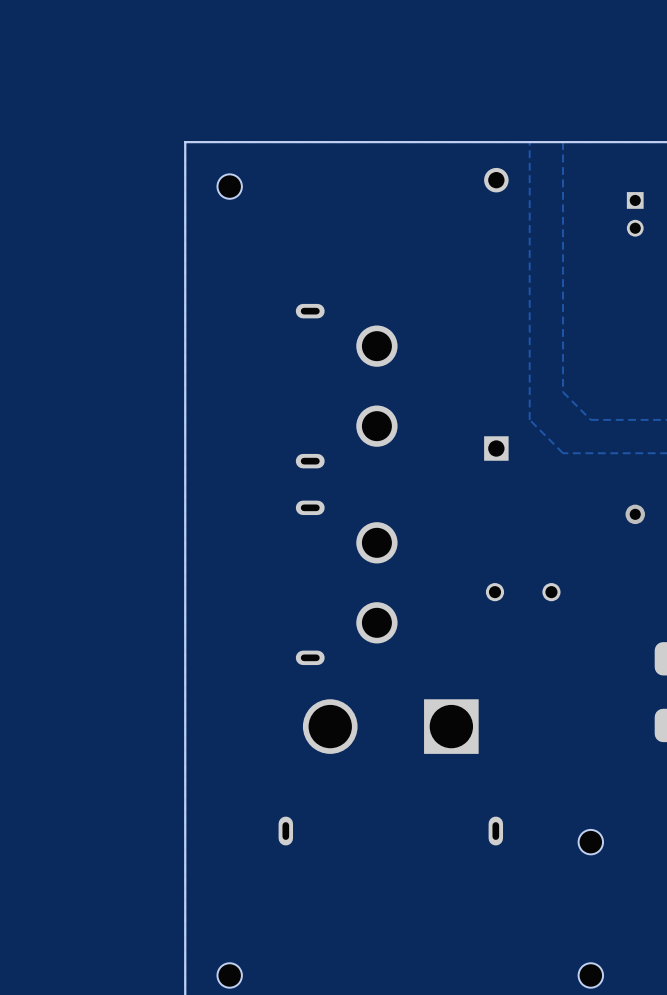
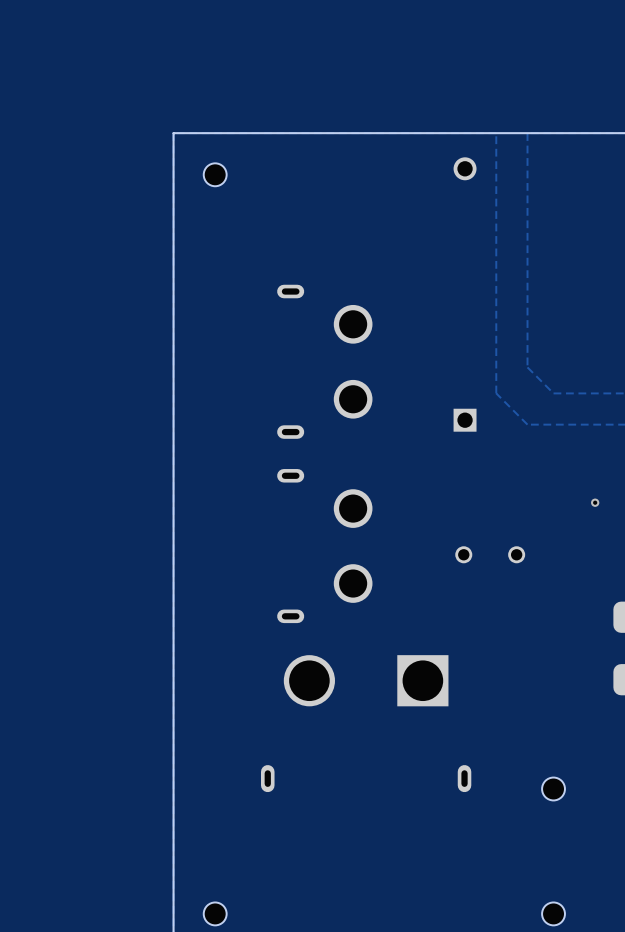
part: (635, 214) -> none
via: (635, 514) -> none
via: none -> (595, 502)

